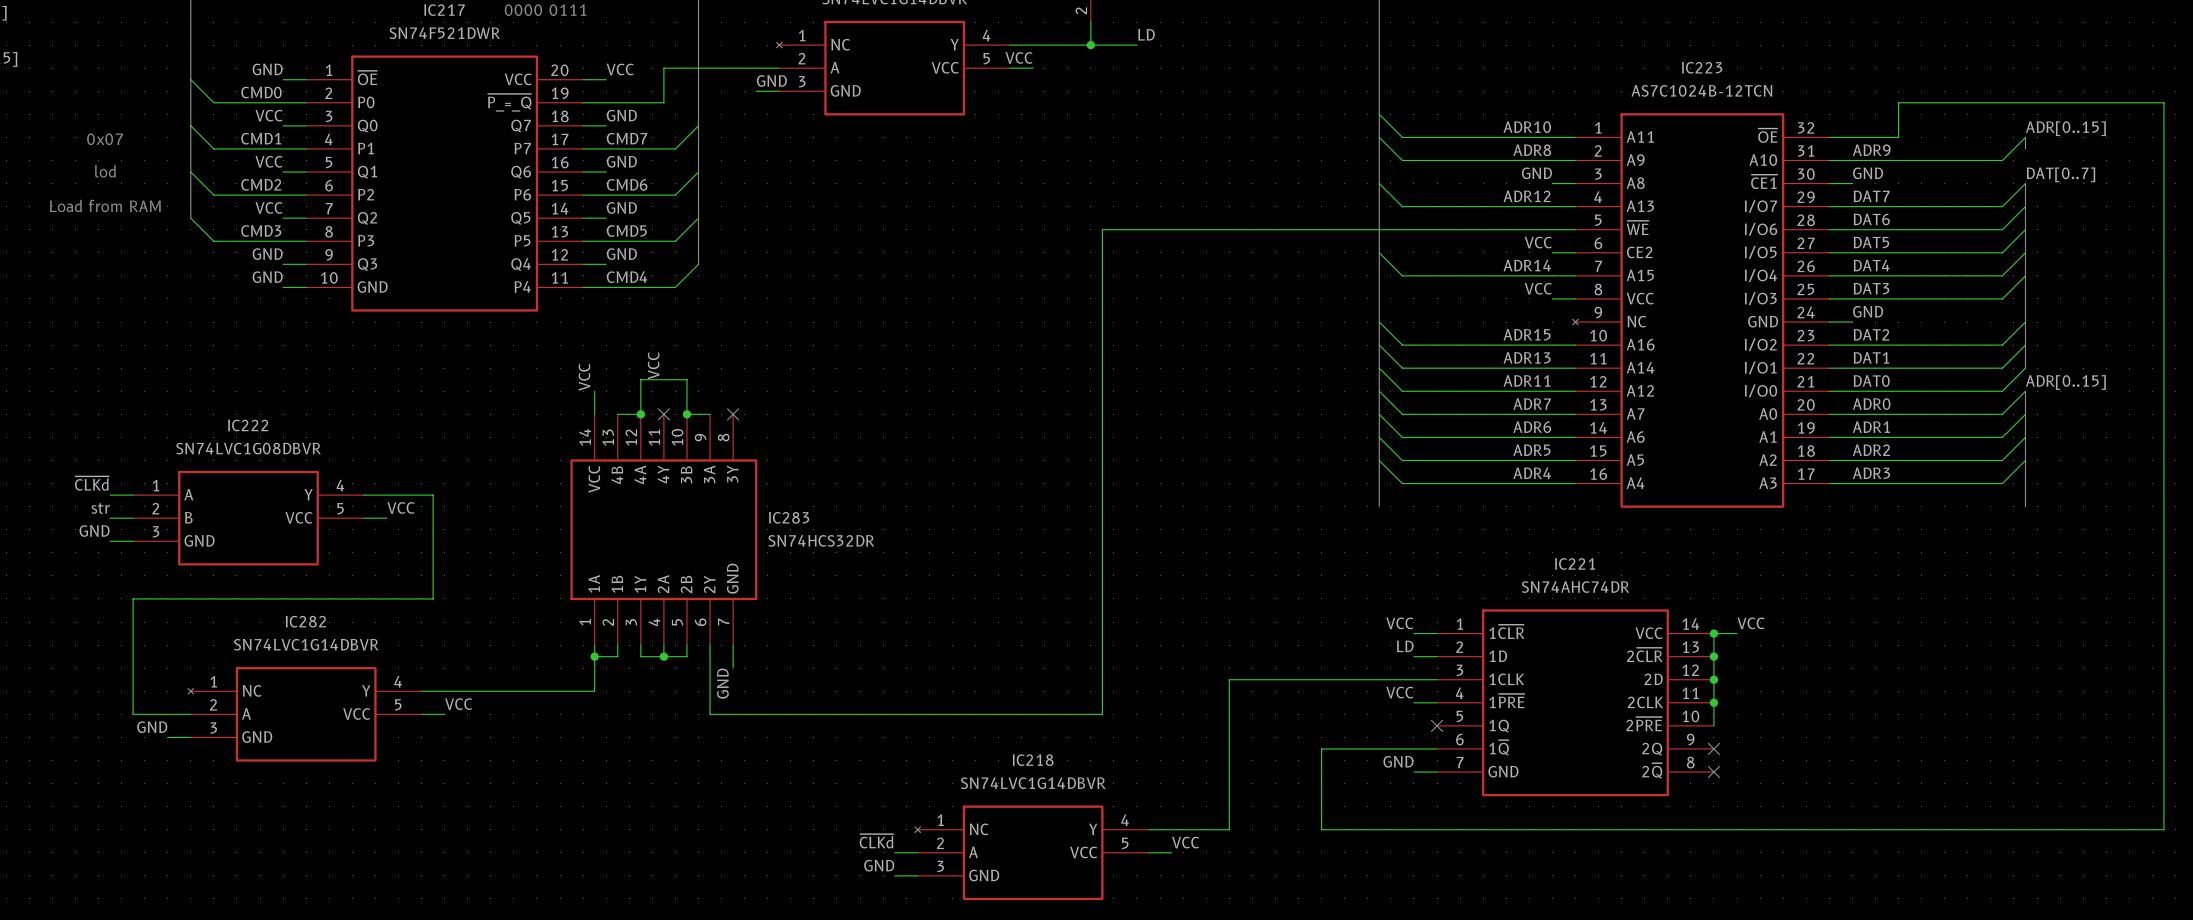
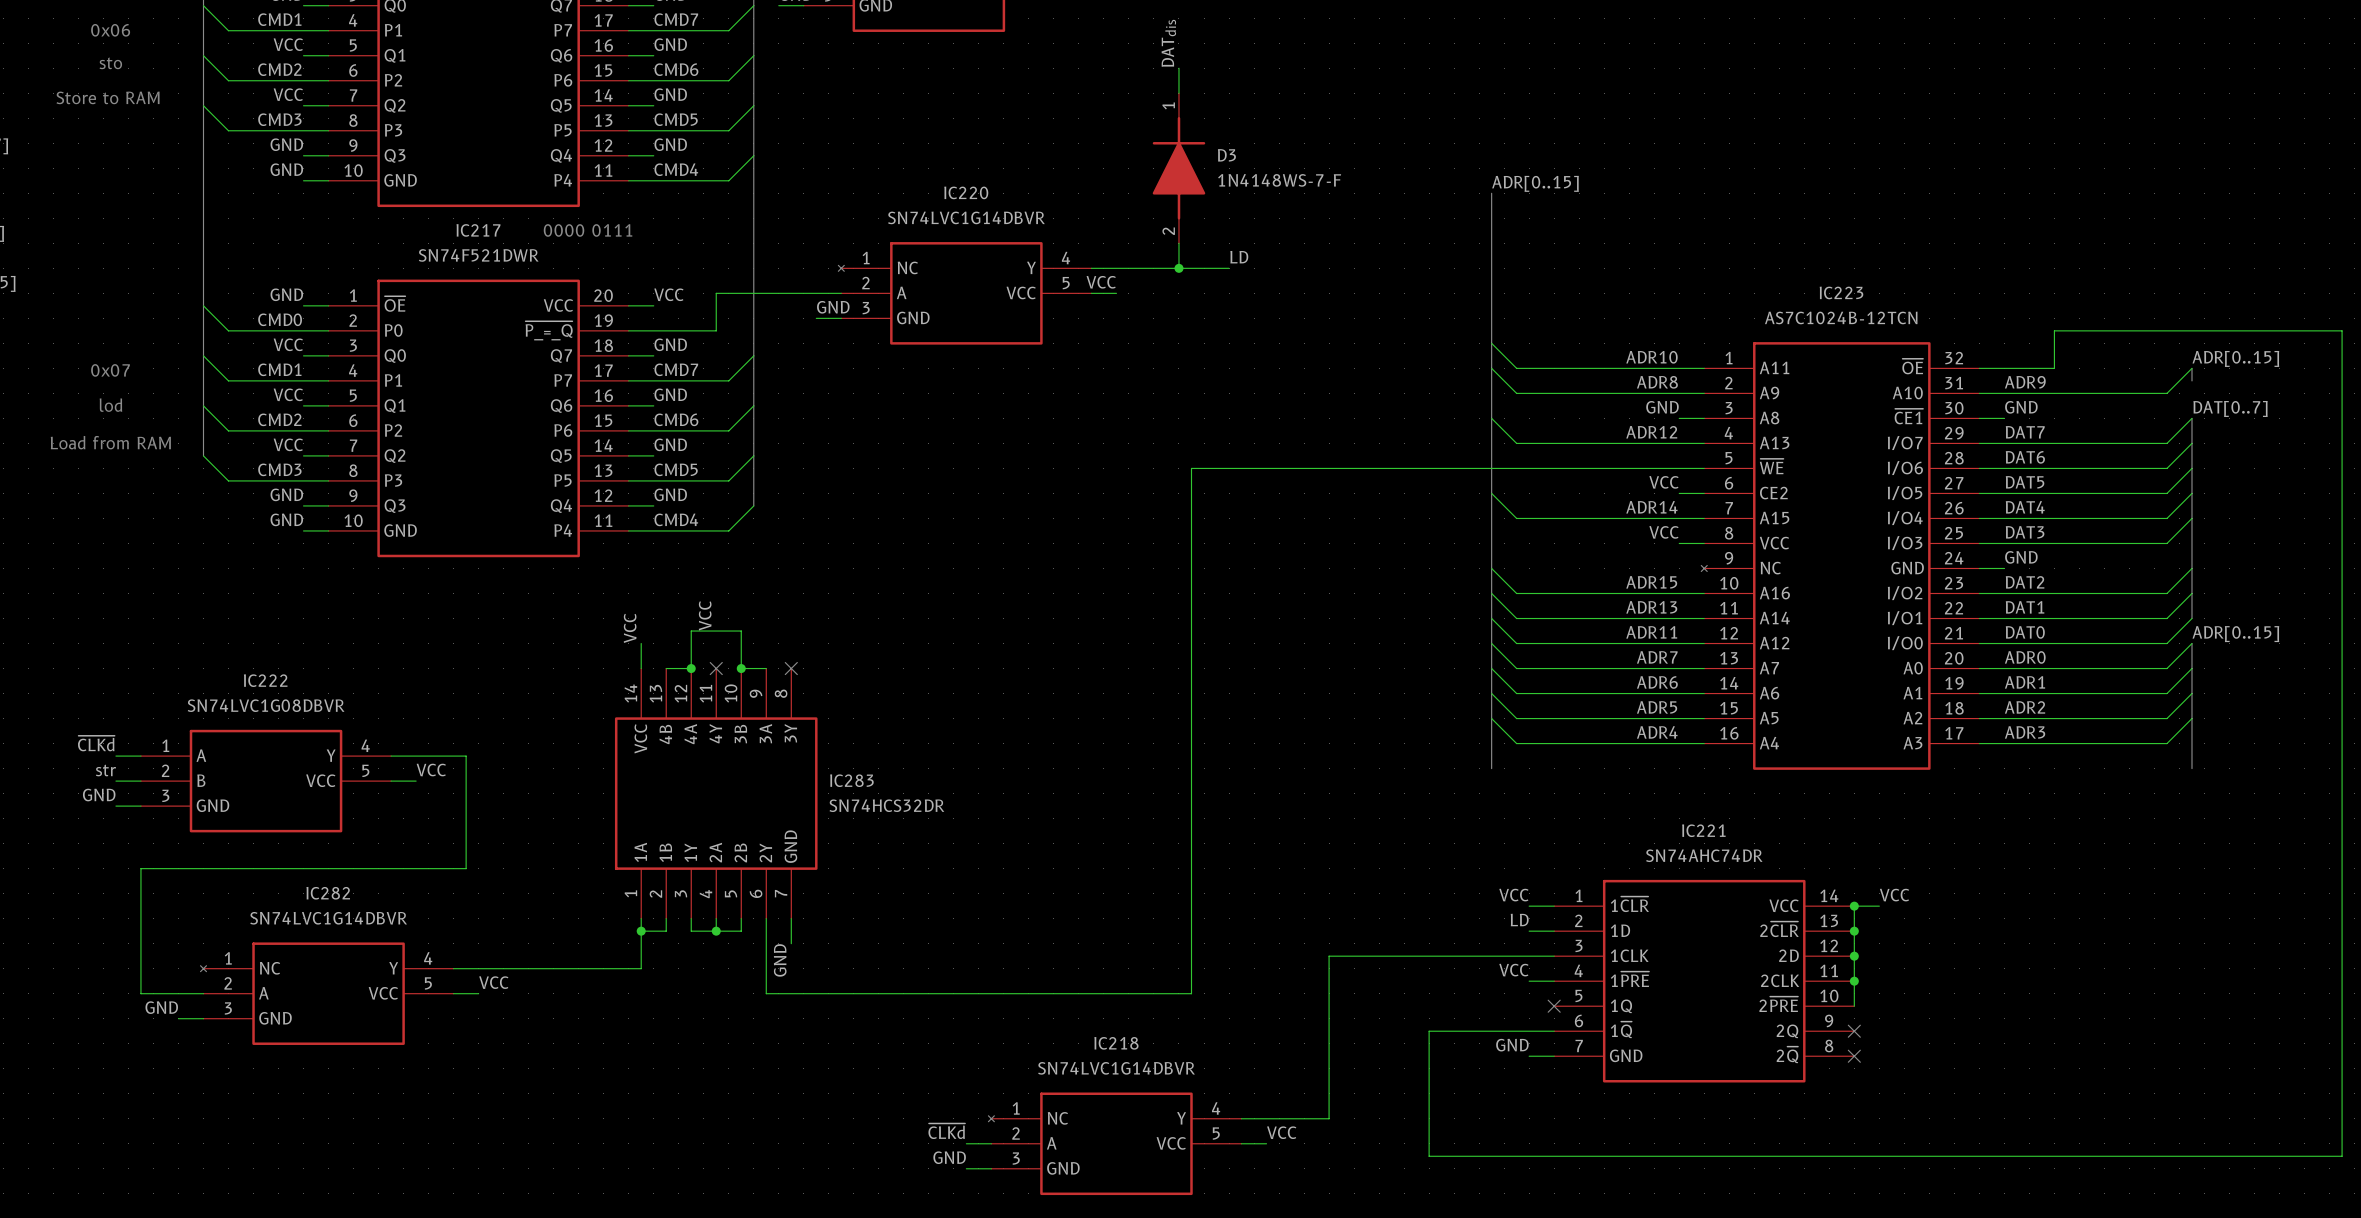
wire: (1321, 829) (2163, 829) -> (1429, 1118) (1429, 1156) (2342, 1156) (2342, 1118)

